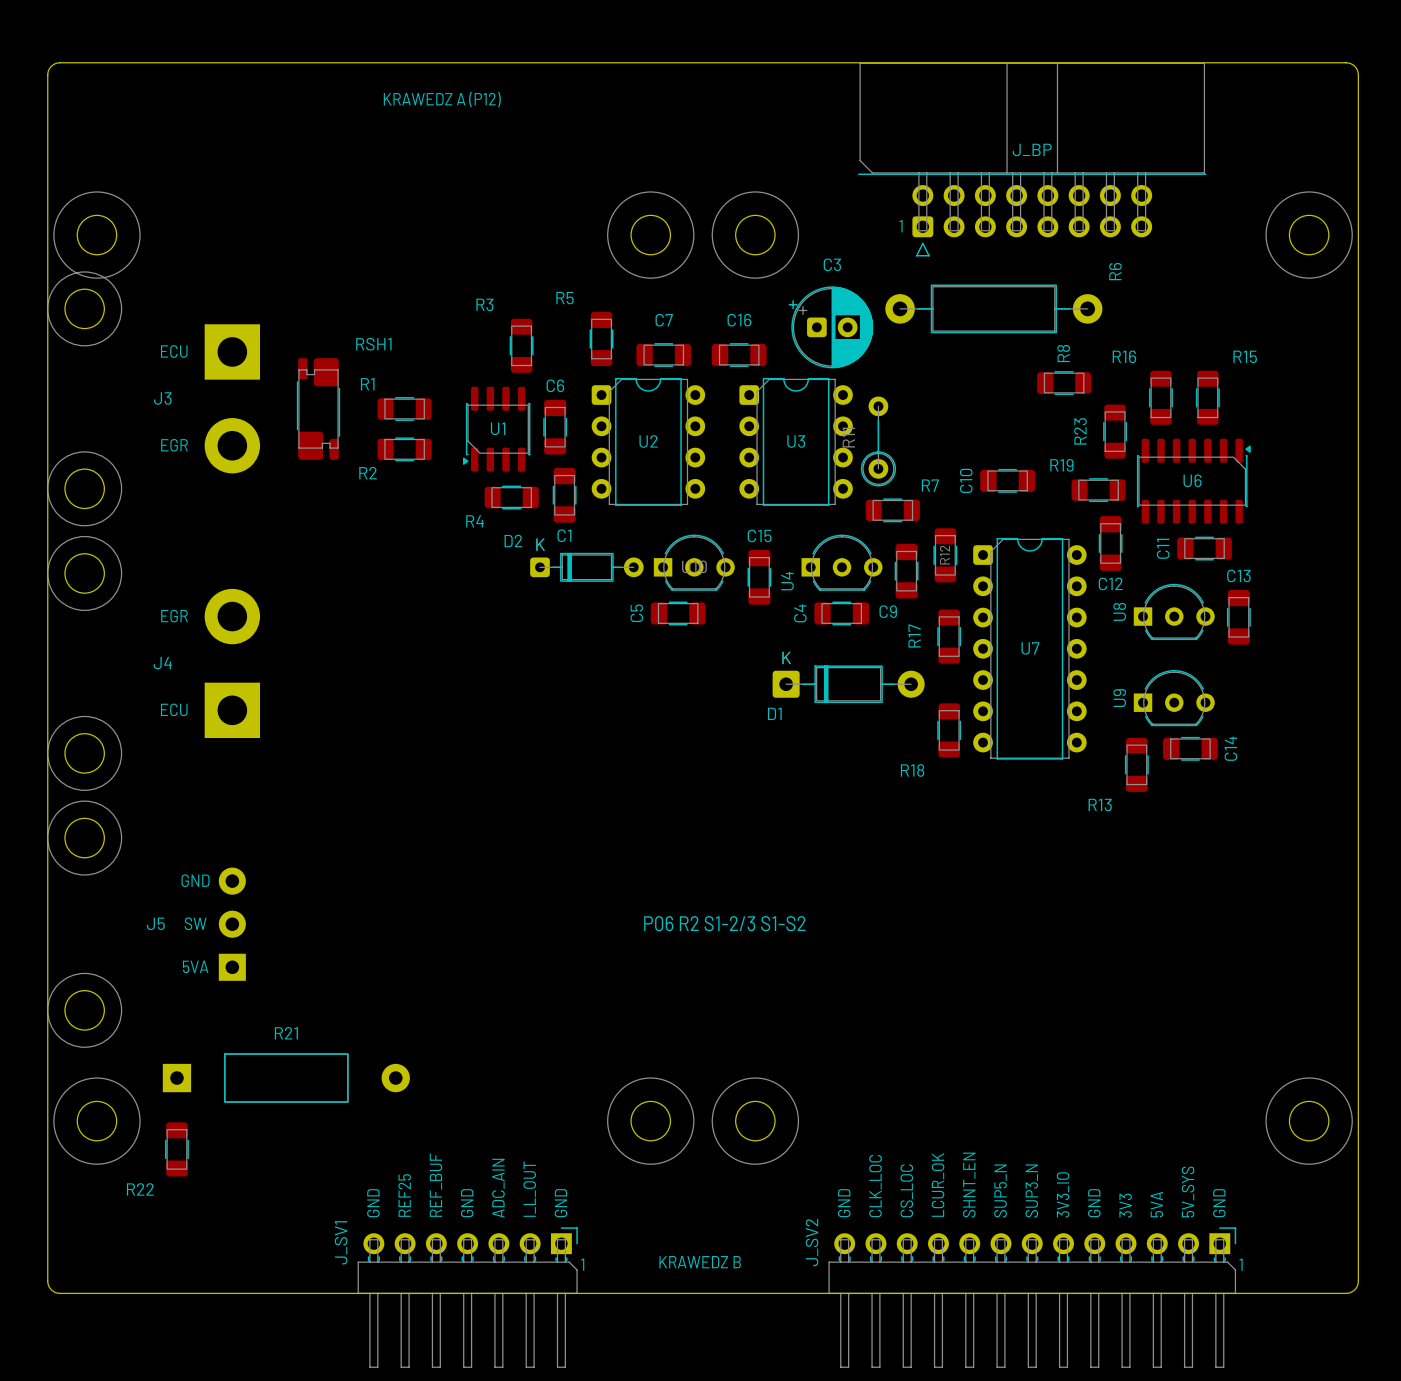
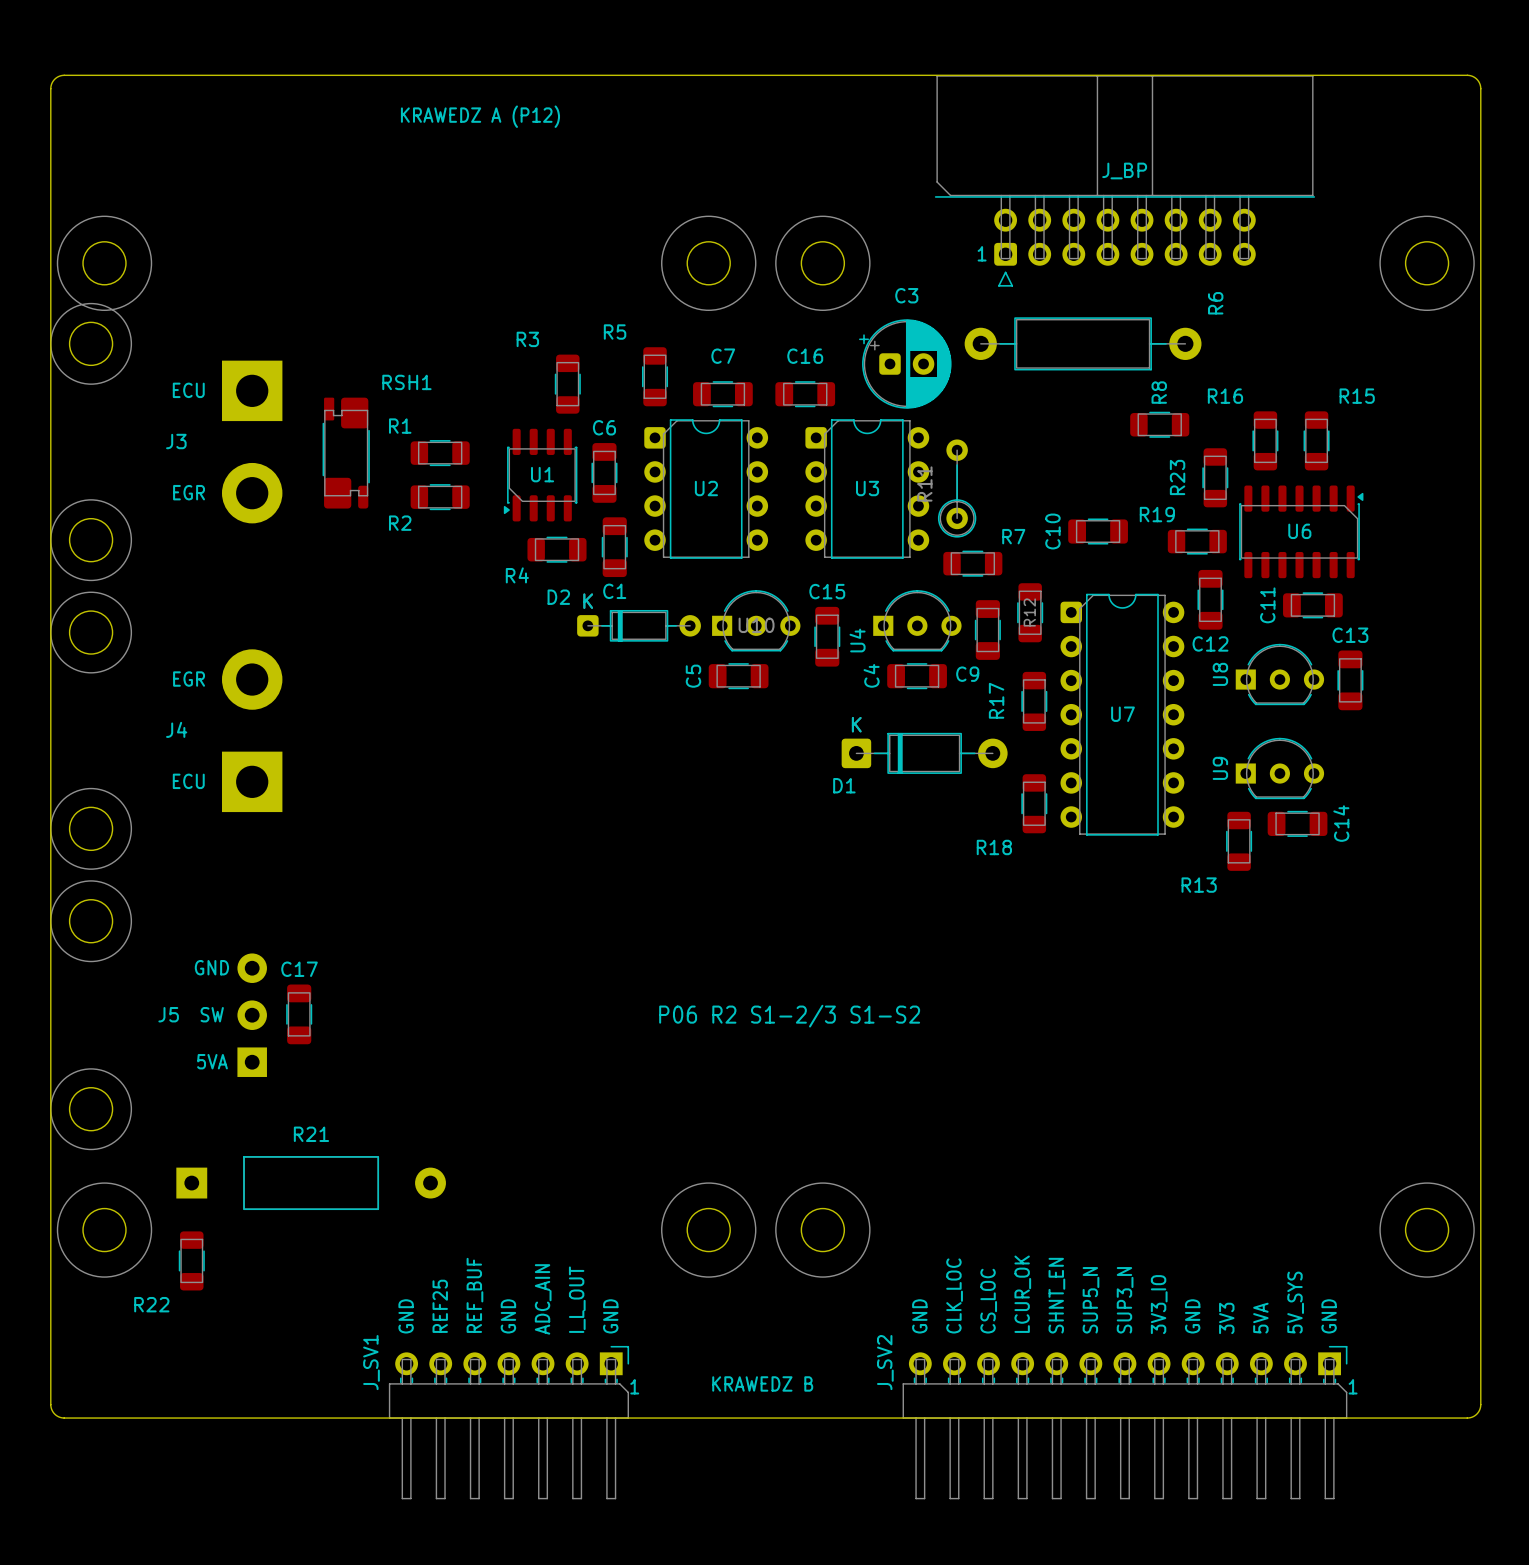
C17: none -> (299, 1014)

